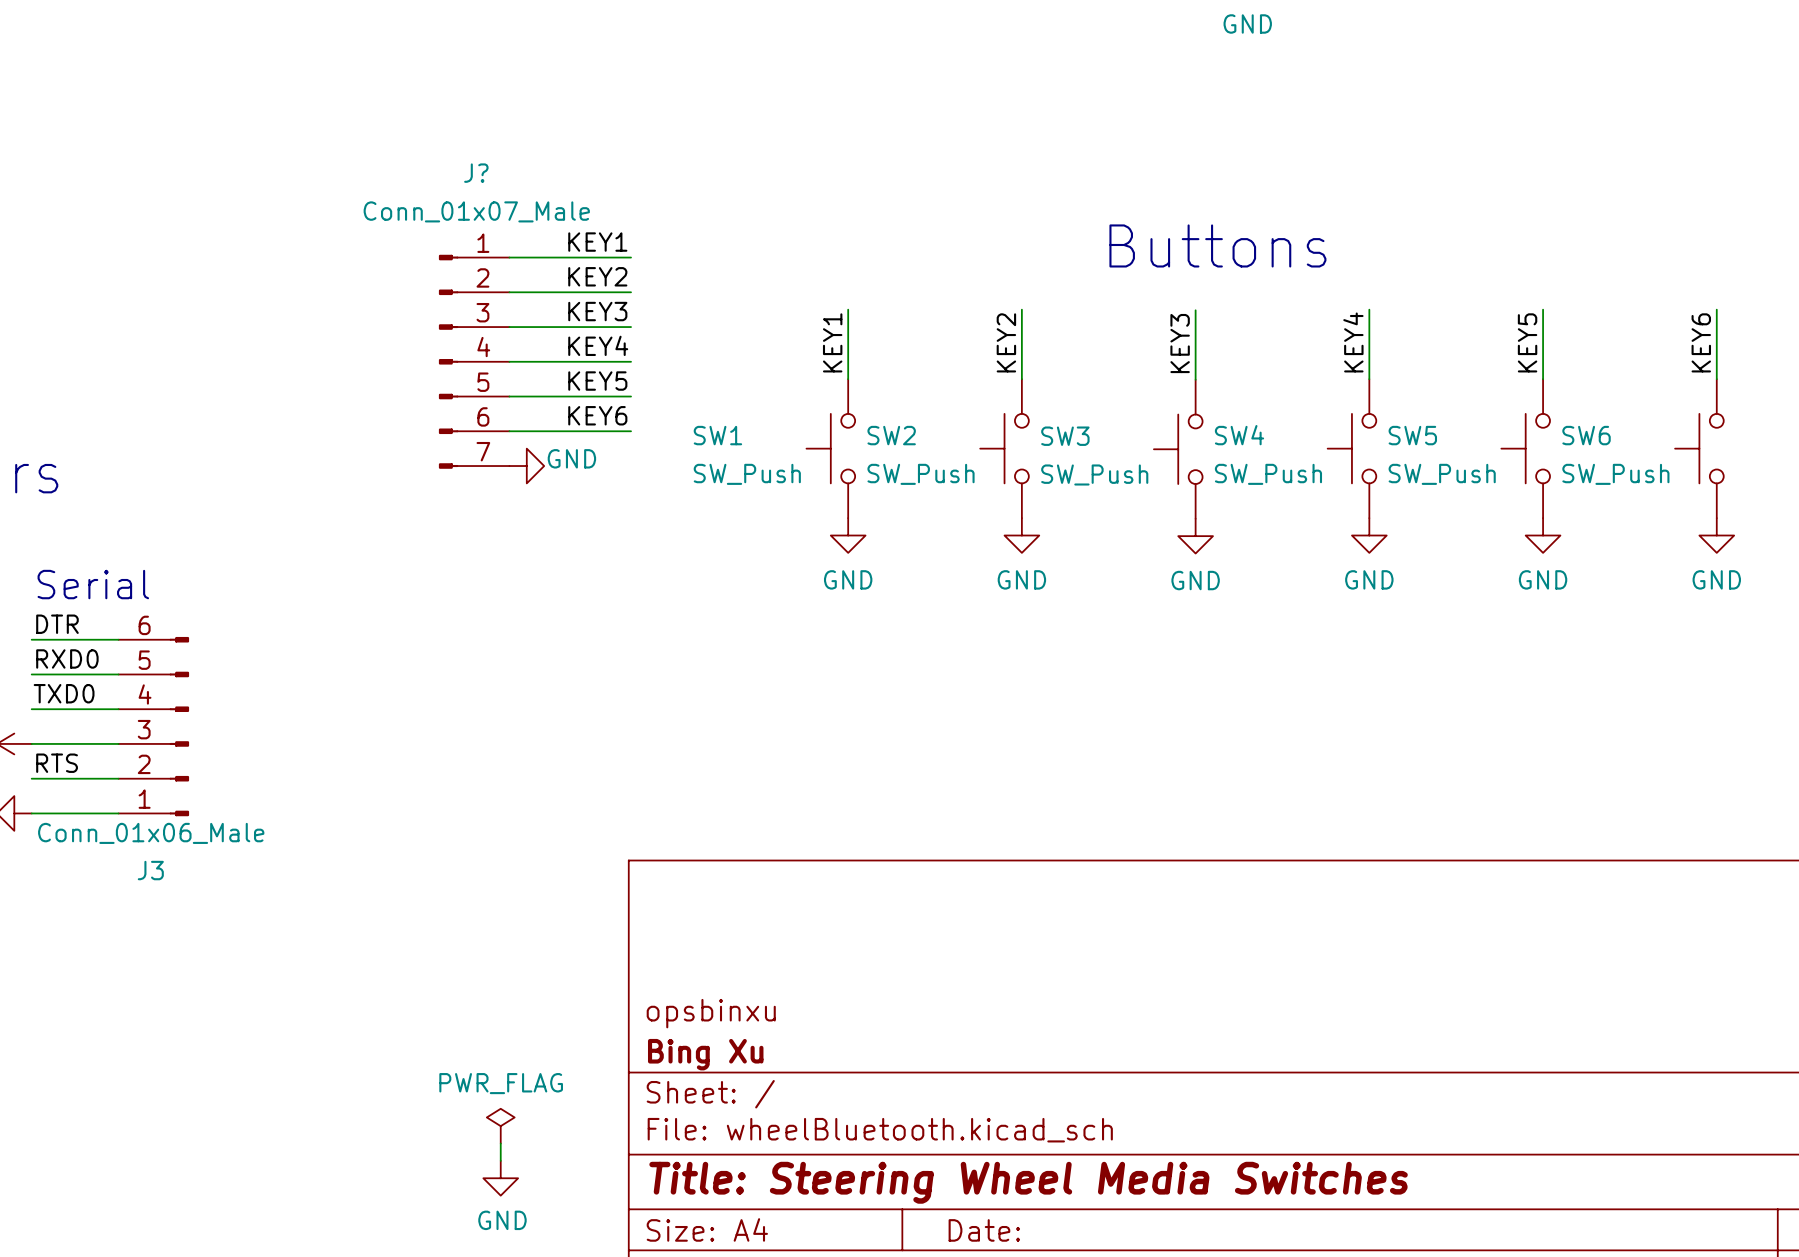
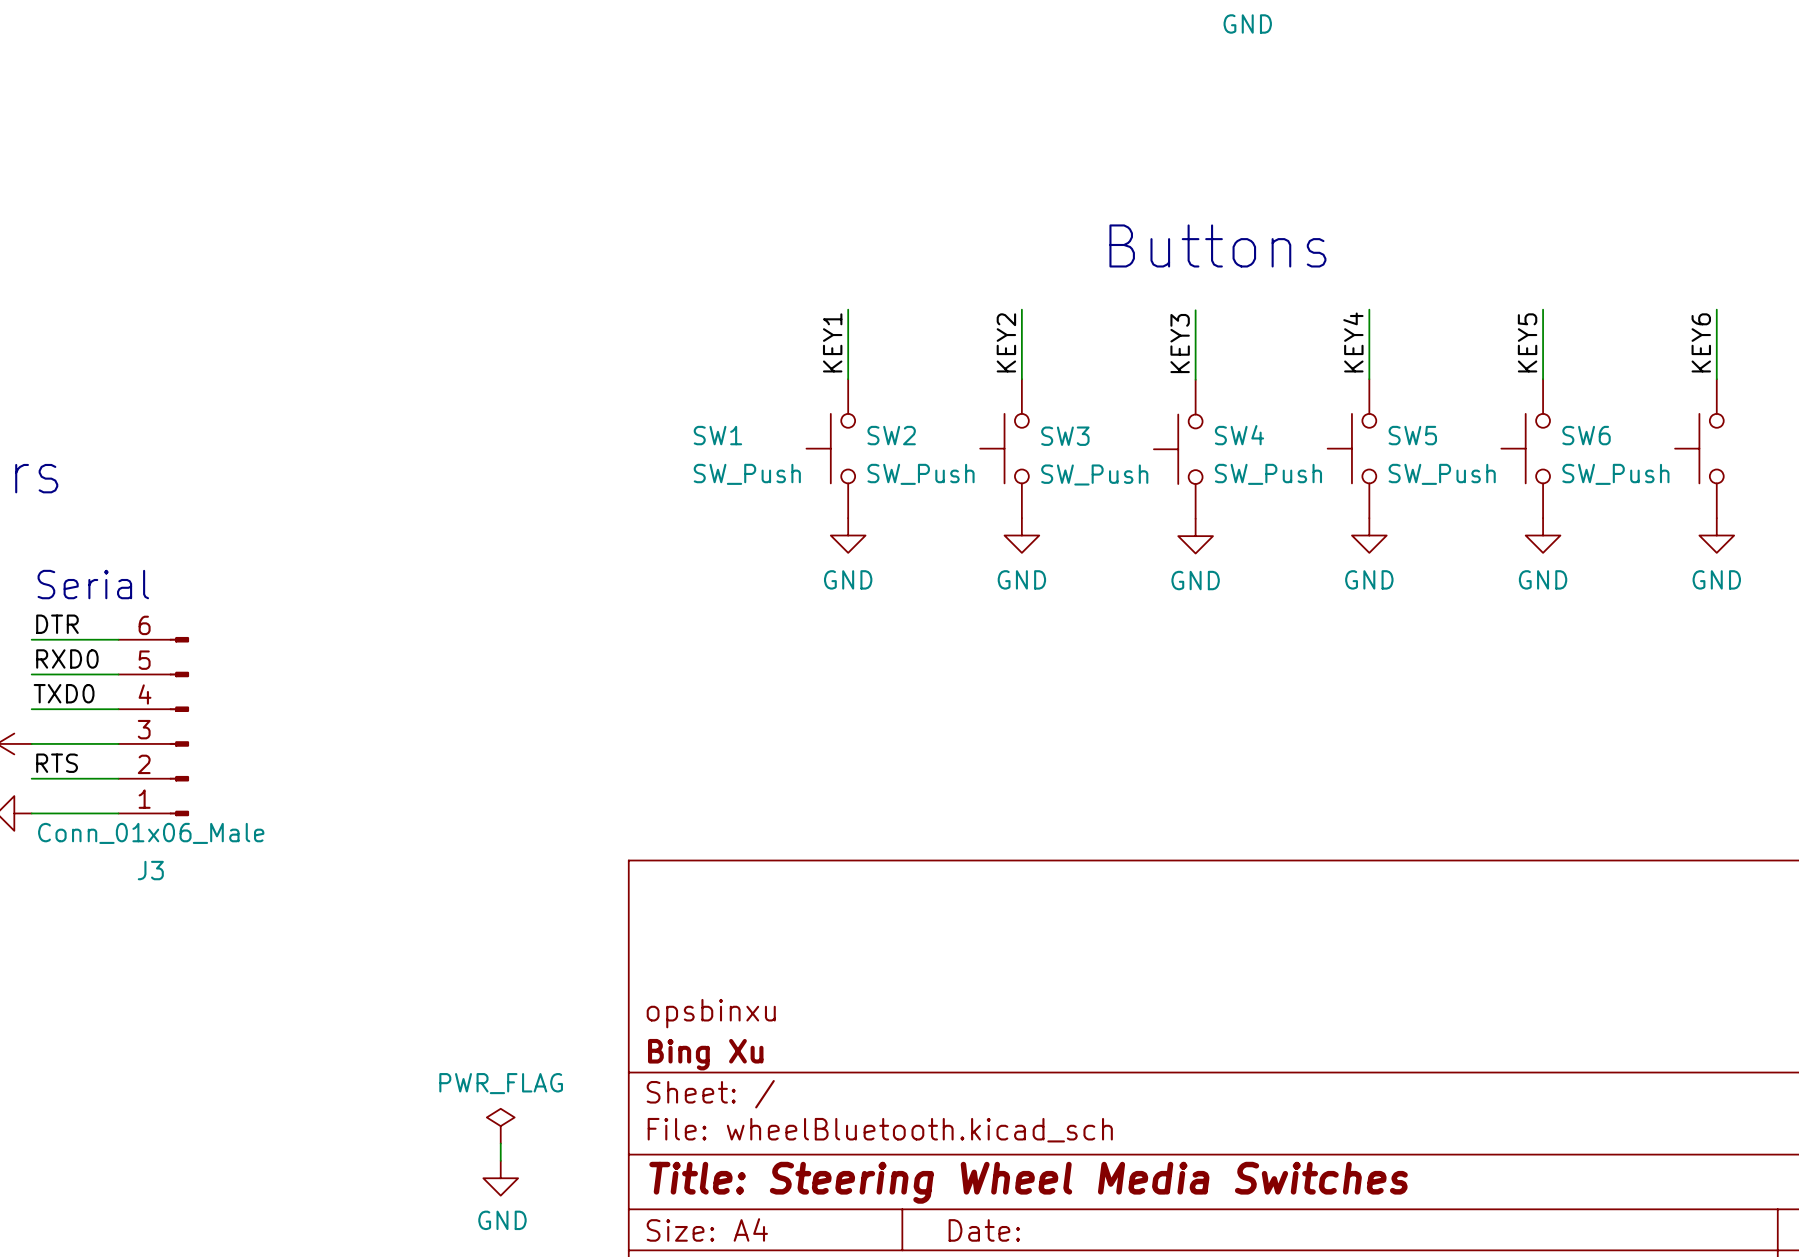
label: KEY1 (597, 242) -> none
wire: (509, 257) (631, 257) -> none
label: KEY2 (597, 276) -> none
wire: (509, 292) (631, 292) -> none
label: KEY3 (597, 311) -> none
wire: (509, 327) (631, 327) -> none
label: KEY4 (598, 345) -> none
J?: Conn_01x07_Male (474, 361) -> none
wire: (509, 361) (631, 361) -> none
label: KEY5 (597, 381) -> none
wire: (509, 396) (631, 396) -> none
label: KEY6 (597, 415) -> none
wire: (509, 431) (631, 431) -> none
power symbol: GND (526, 466) -> none

